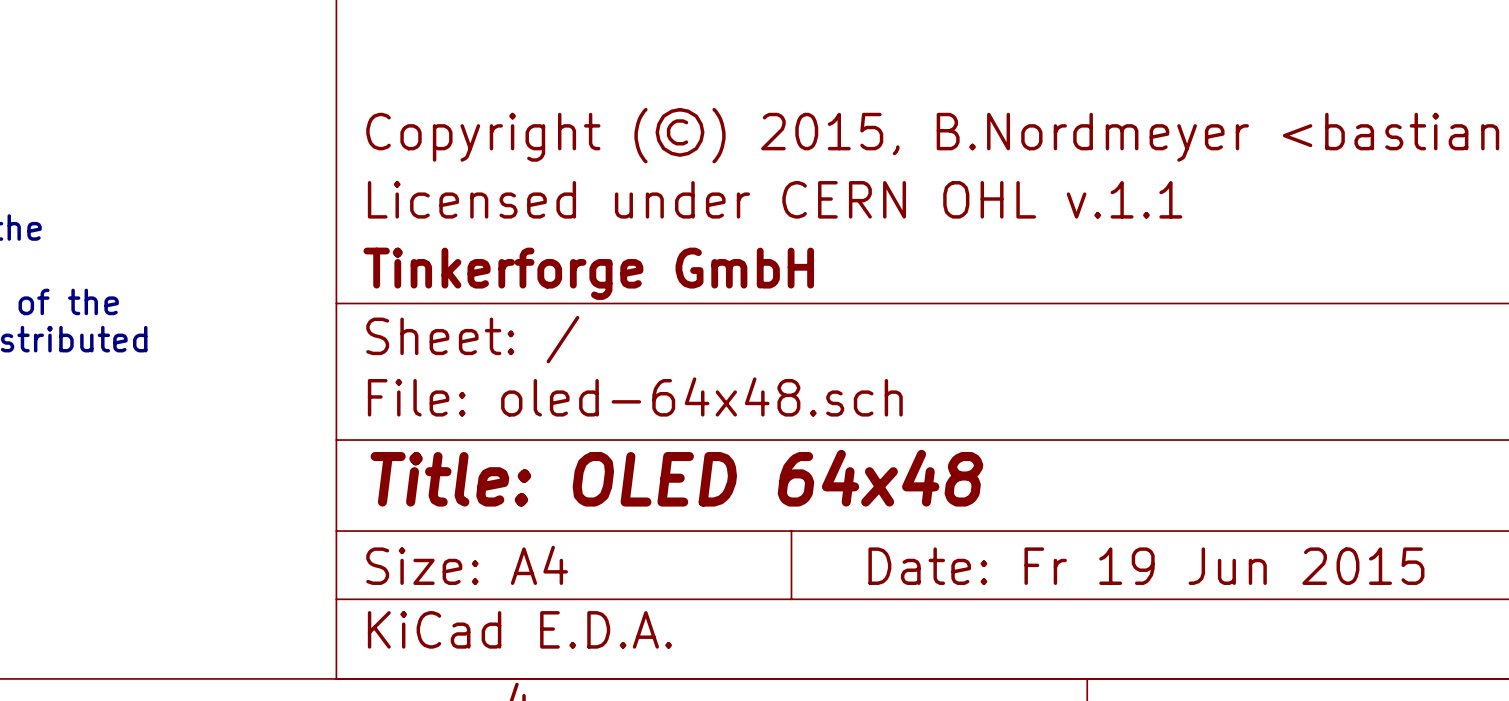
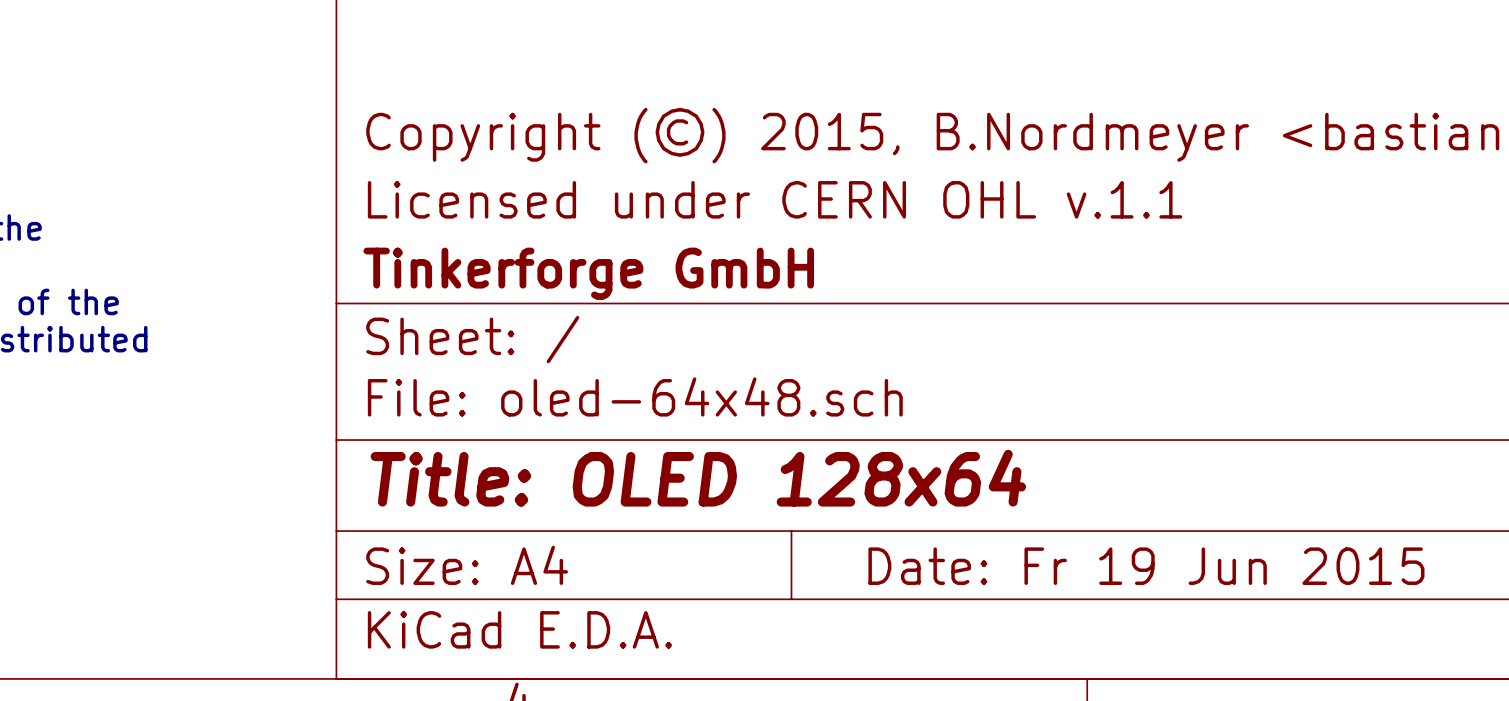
title block: Title: OLED 64x48 (676, 478) -> Title: OLED 128x64 (698, 478)

